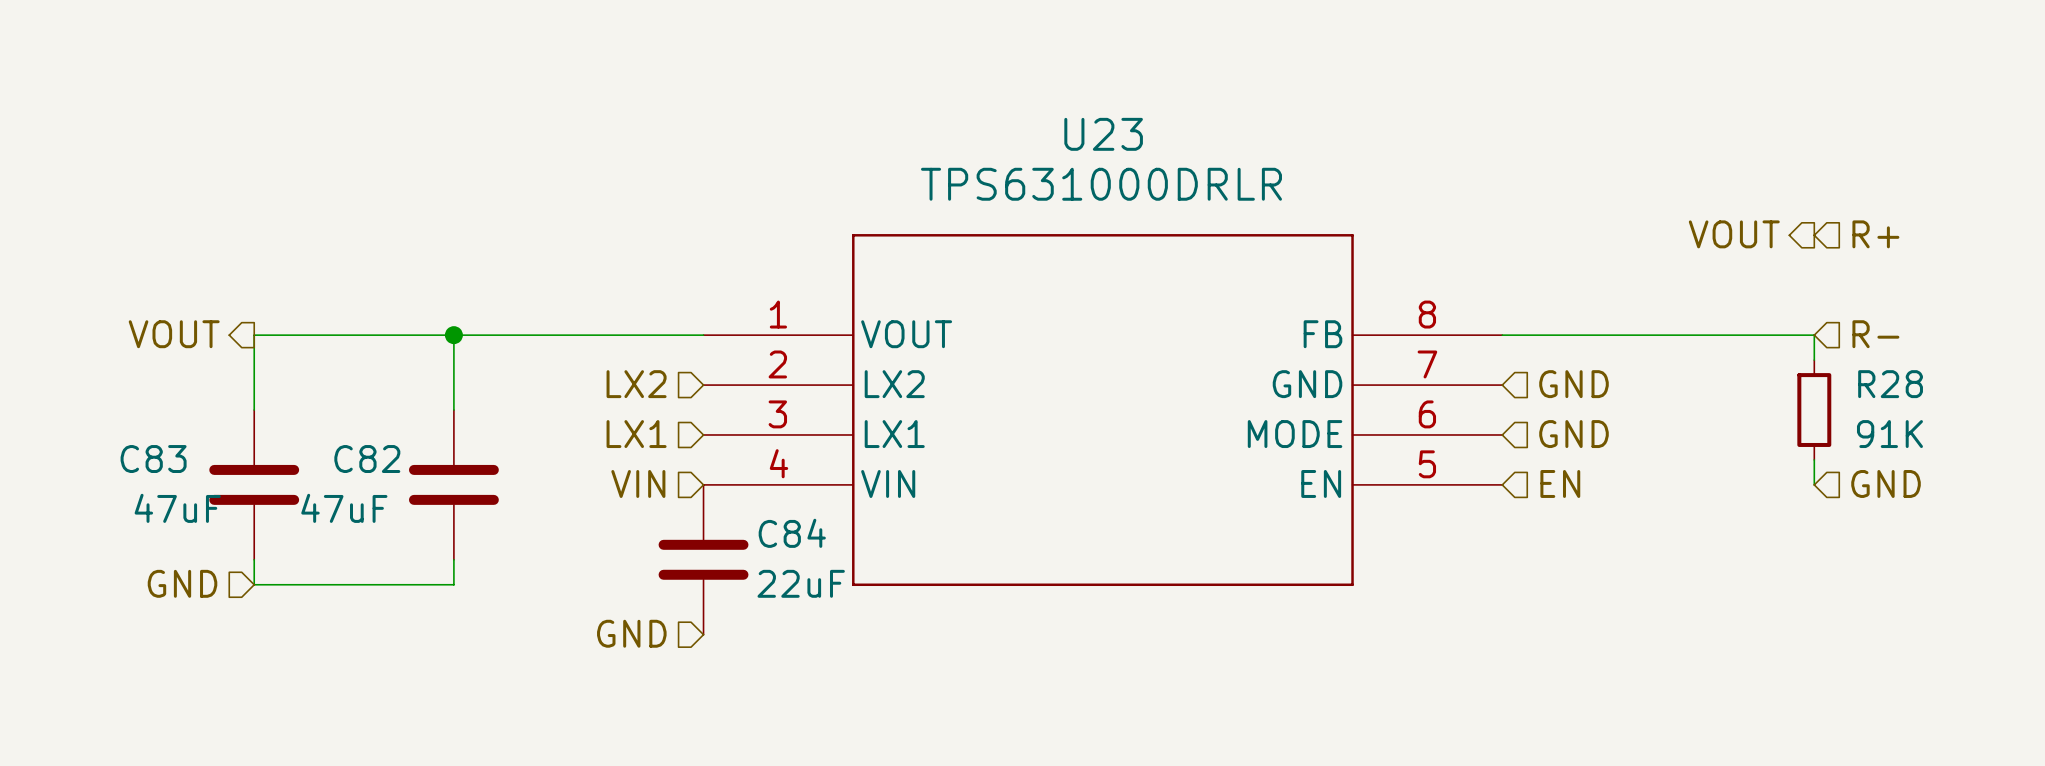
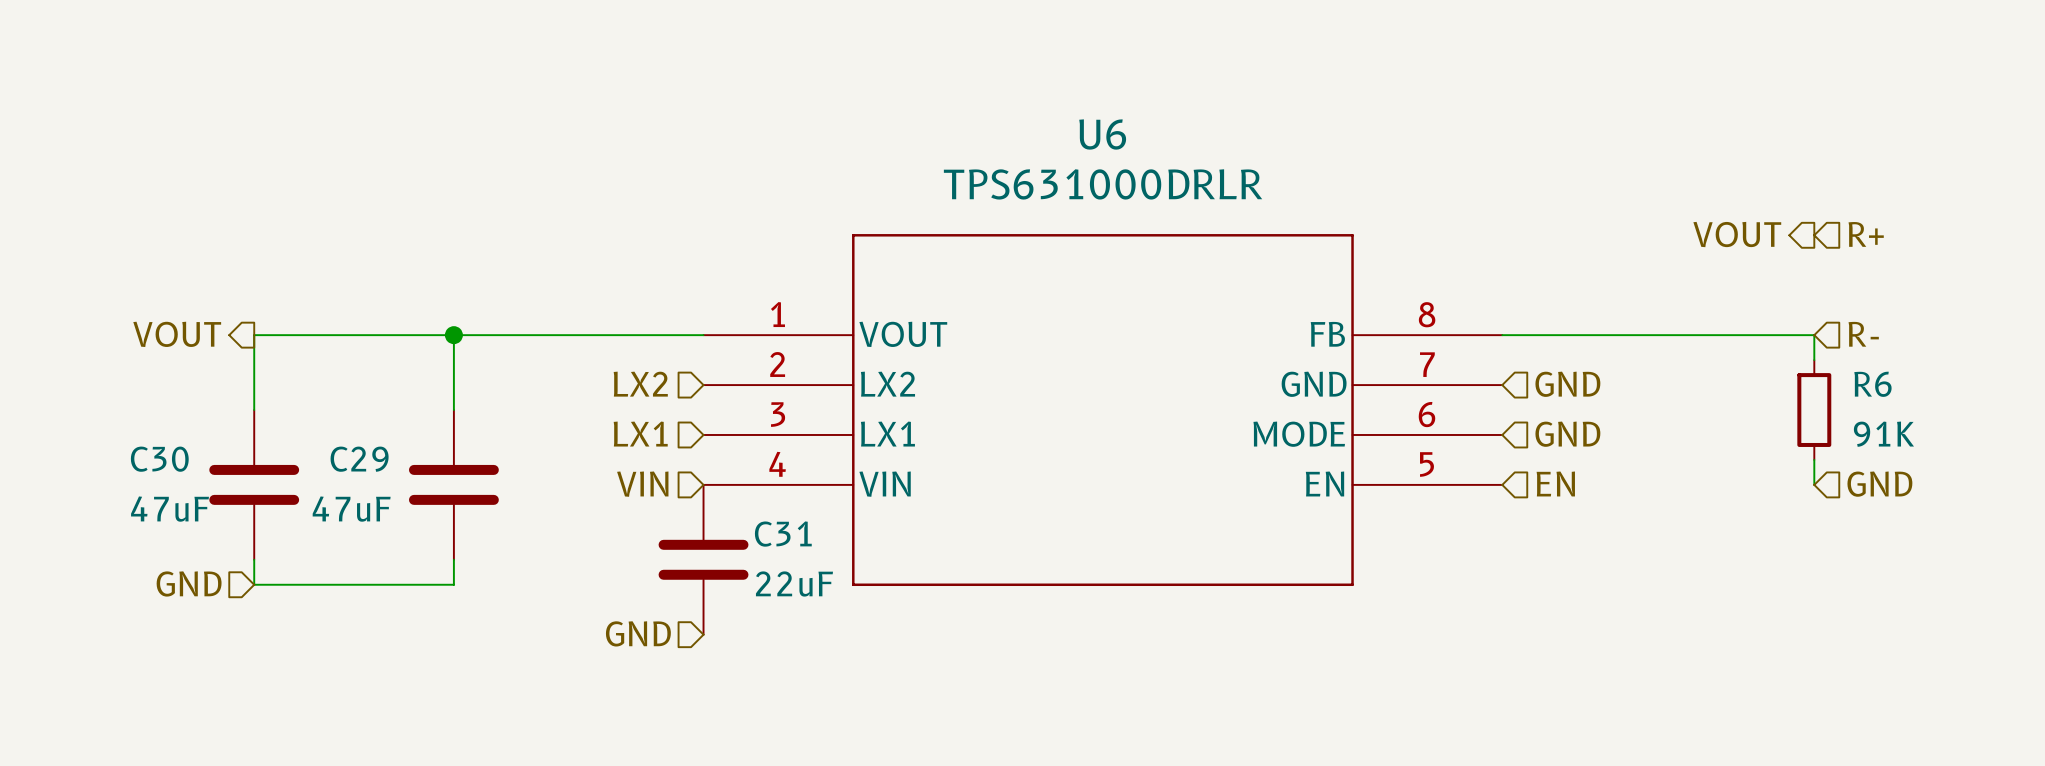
U23 name: U23 (1103, 134) -> U6 (1102, 134)
R28 name: R28 (1890, 384) -> R6 (1872, 384)
C83 name: C83 (153, 459) -> C30 (159, 459)
C82 name: C82 (367, 459) -> C29 (359, 459)
C84 name: C84 (792, 533) -> C31 (783, 534)

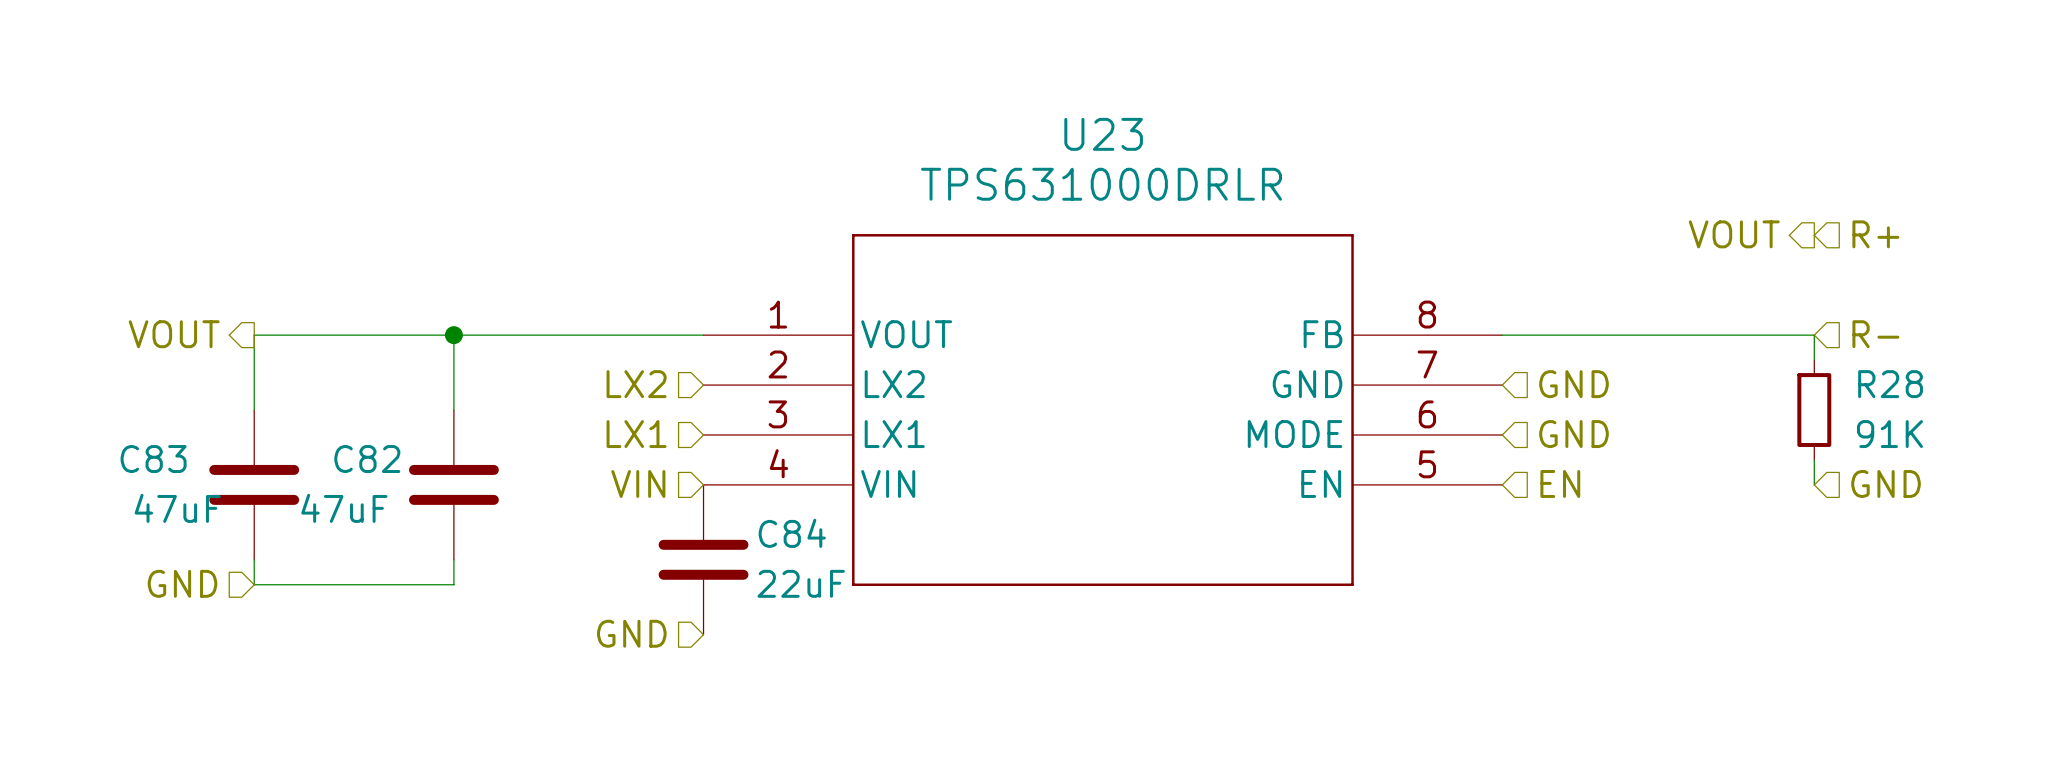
U6 name: U6 (1102, 134) -> U23 (1103, 134)
R6 name: R6 (1872, 384) -> R28 (1890, 384)
C30 name: C30 (159, 459) -> C83 (153, 459)
C29 name: C29 (359, 459) -> C82 (367, 459)
C31 name: C31 (783, 534) -> C84 (792, 533)

